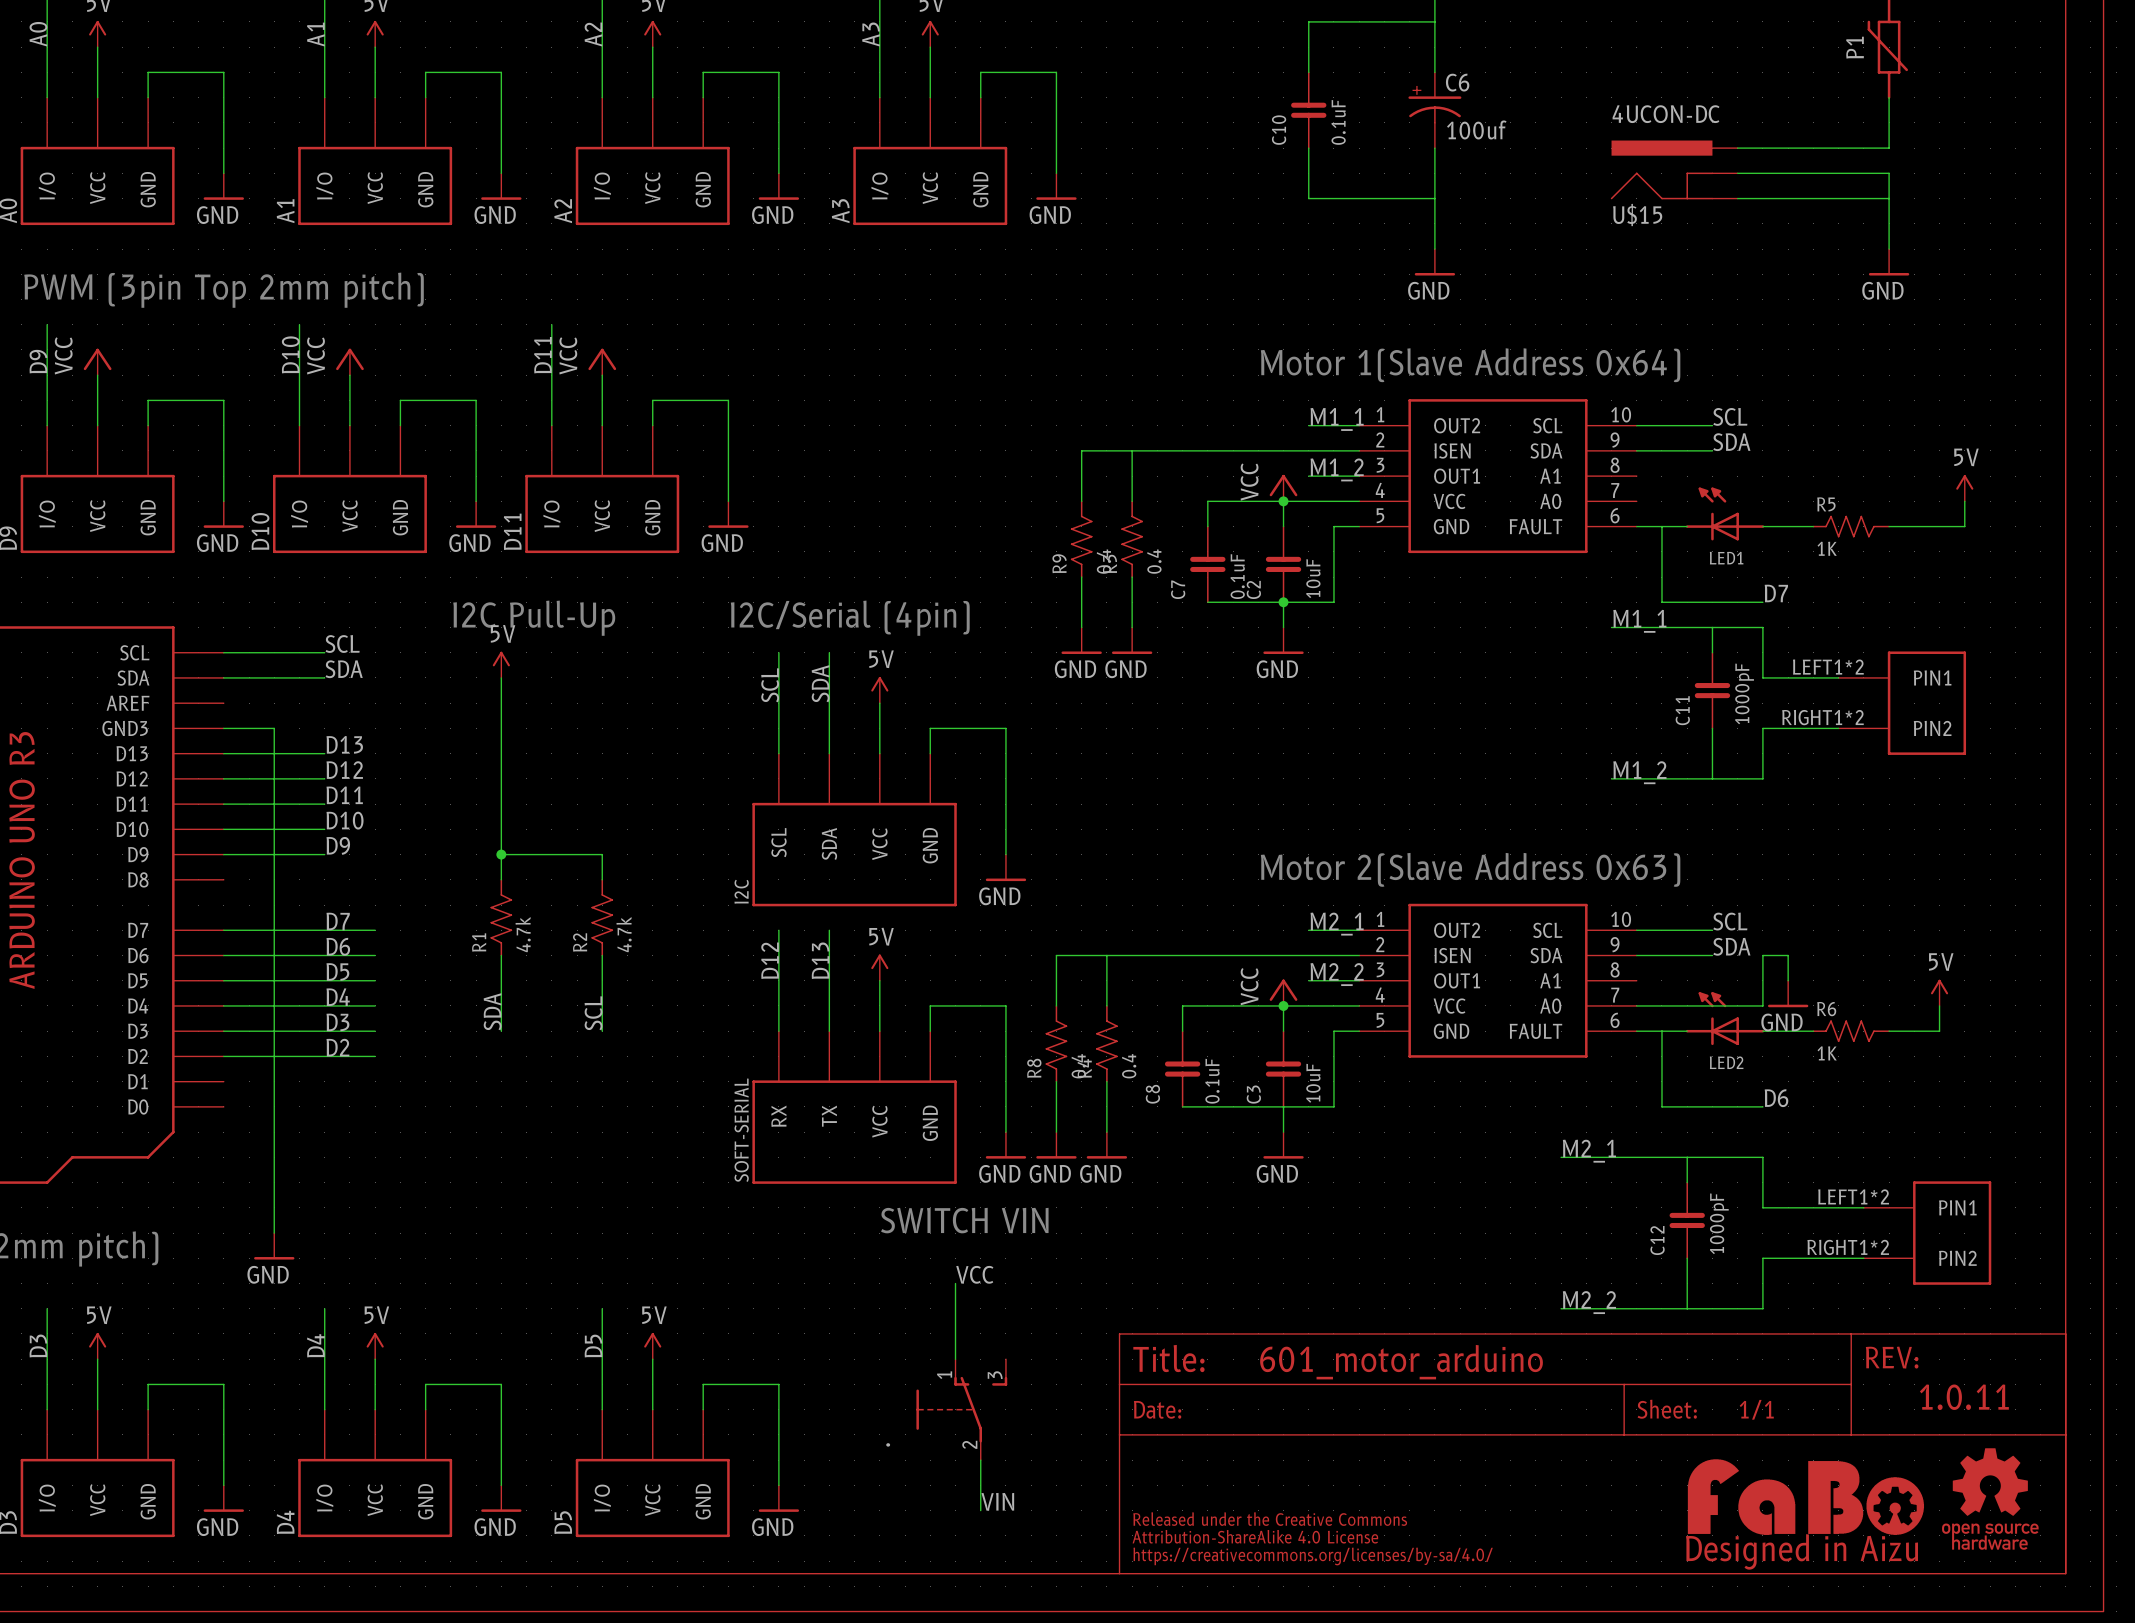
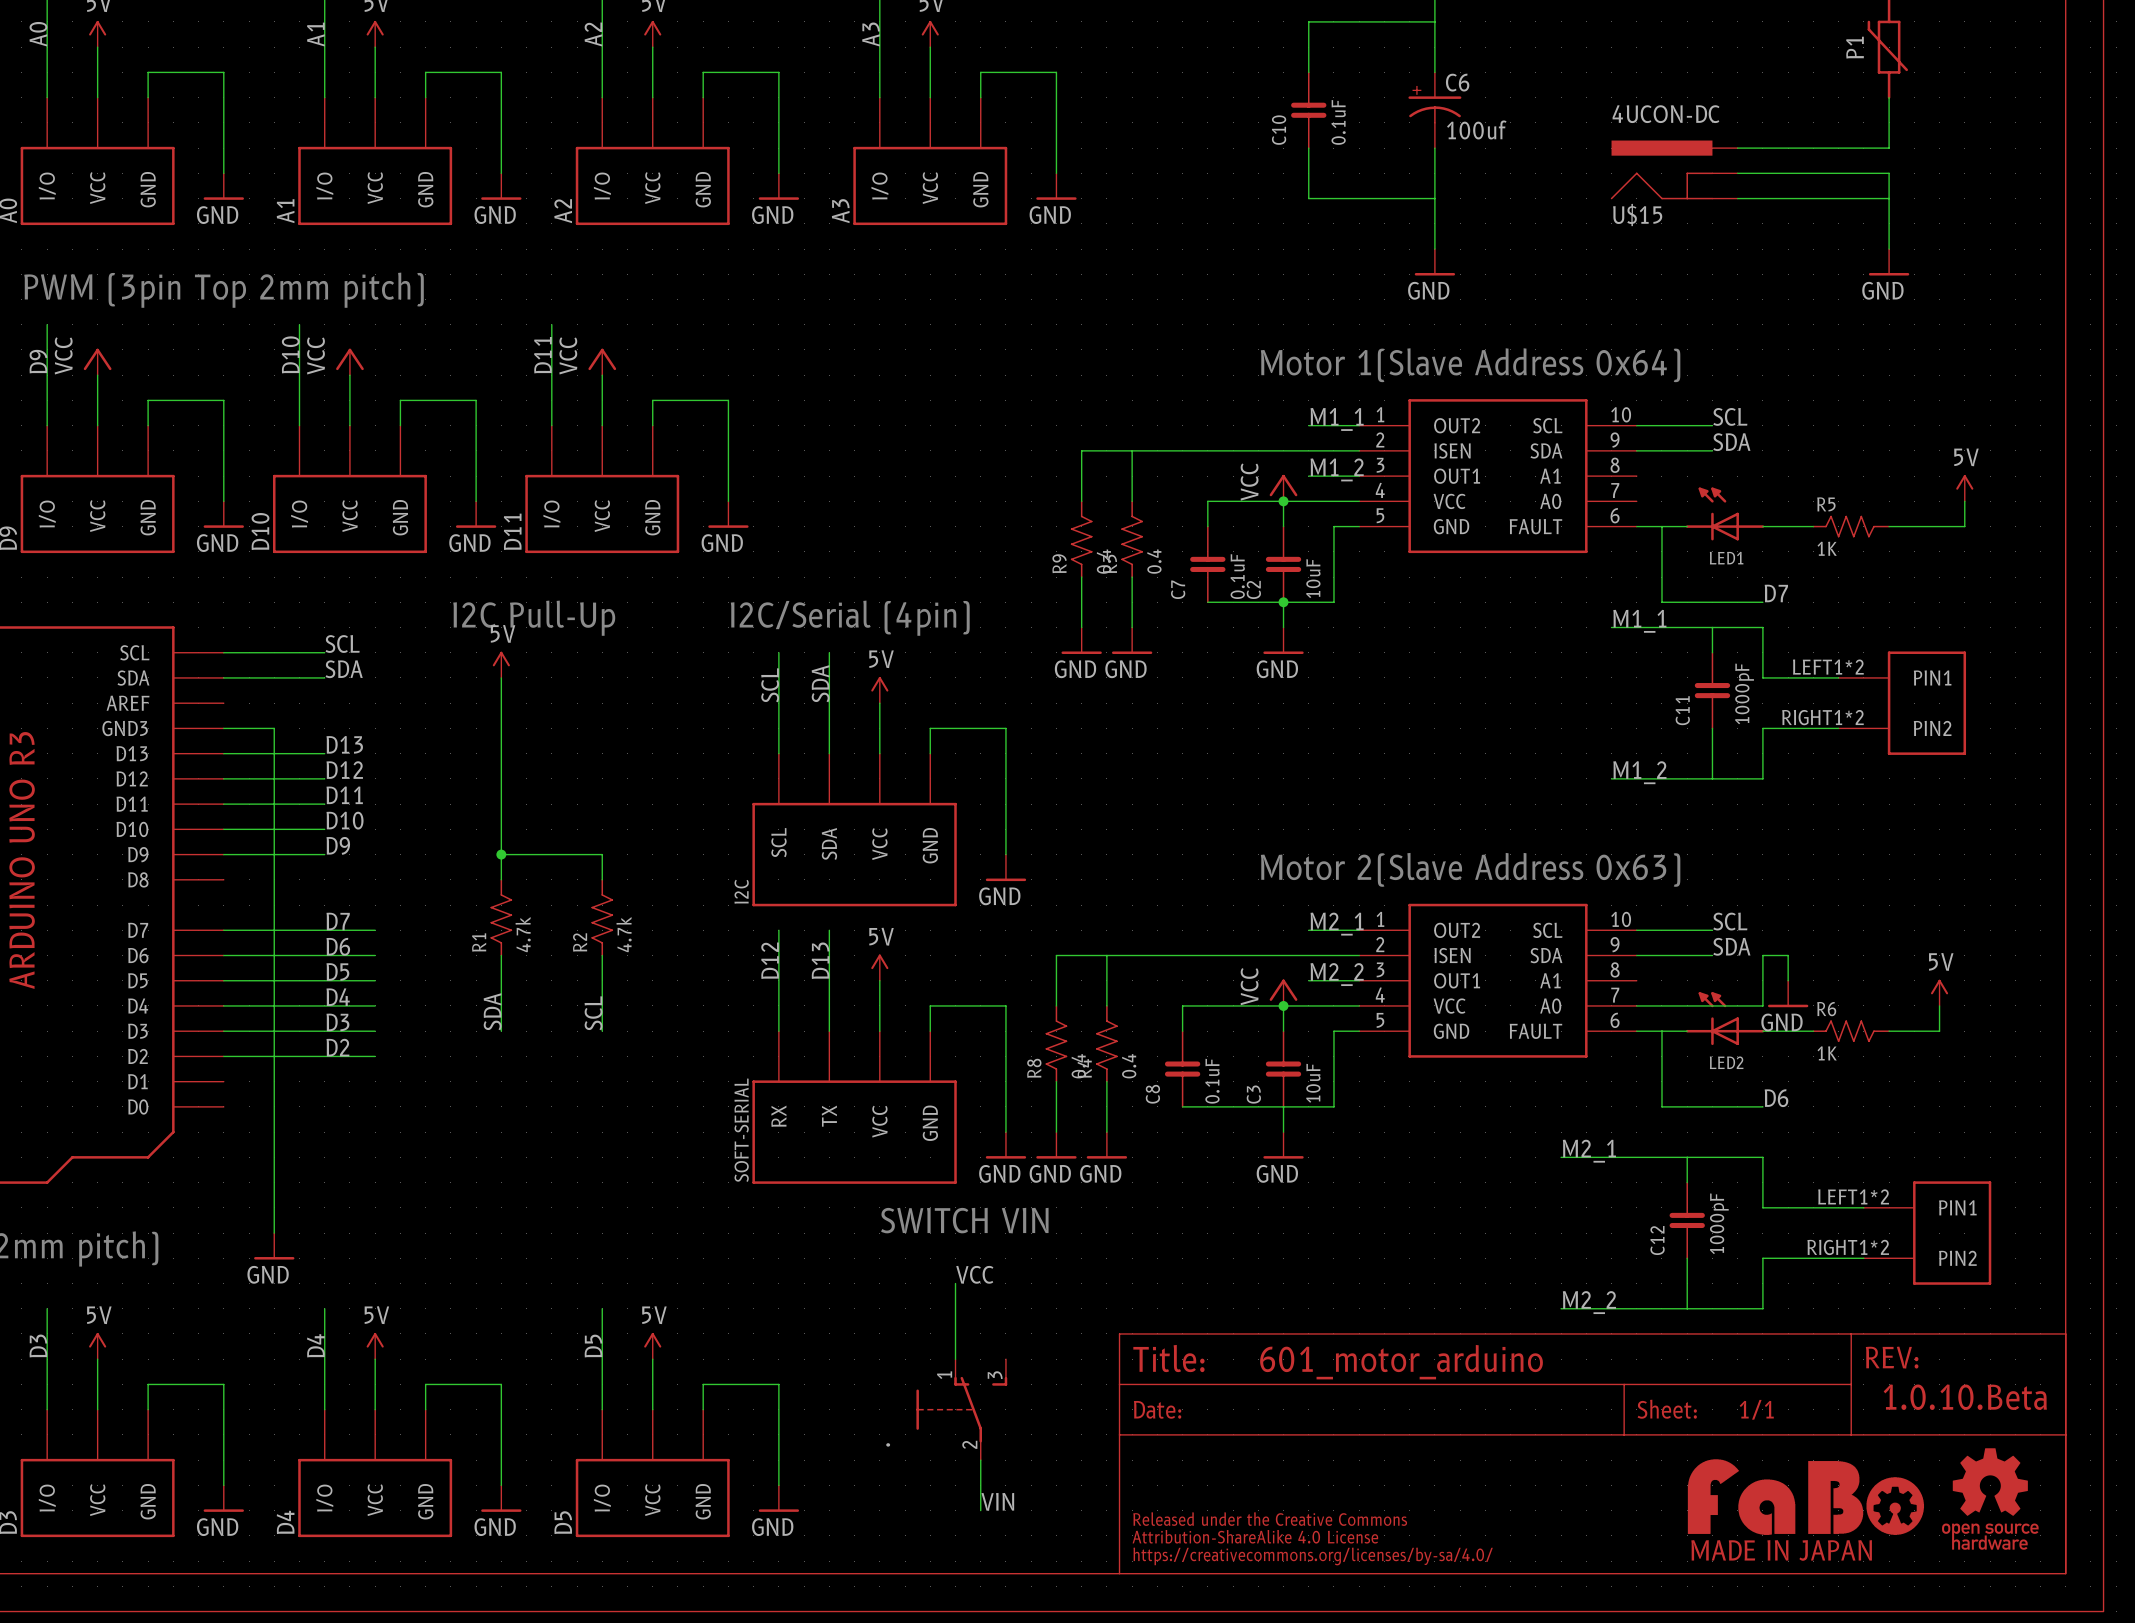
text: 1.0.11 (1964, 1397) -> 1.0.10.Beta (1965, 1397)
part text: none -> MADE IN JAPAN (1781, 1550)
part text: Designed in Aizu (1801, 1551) -> none

